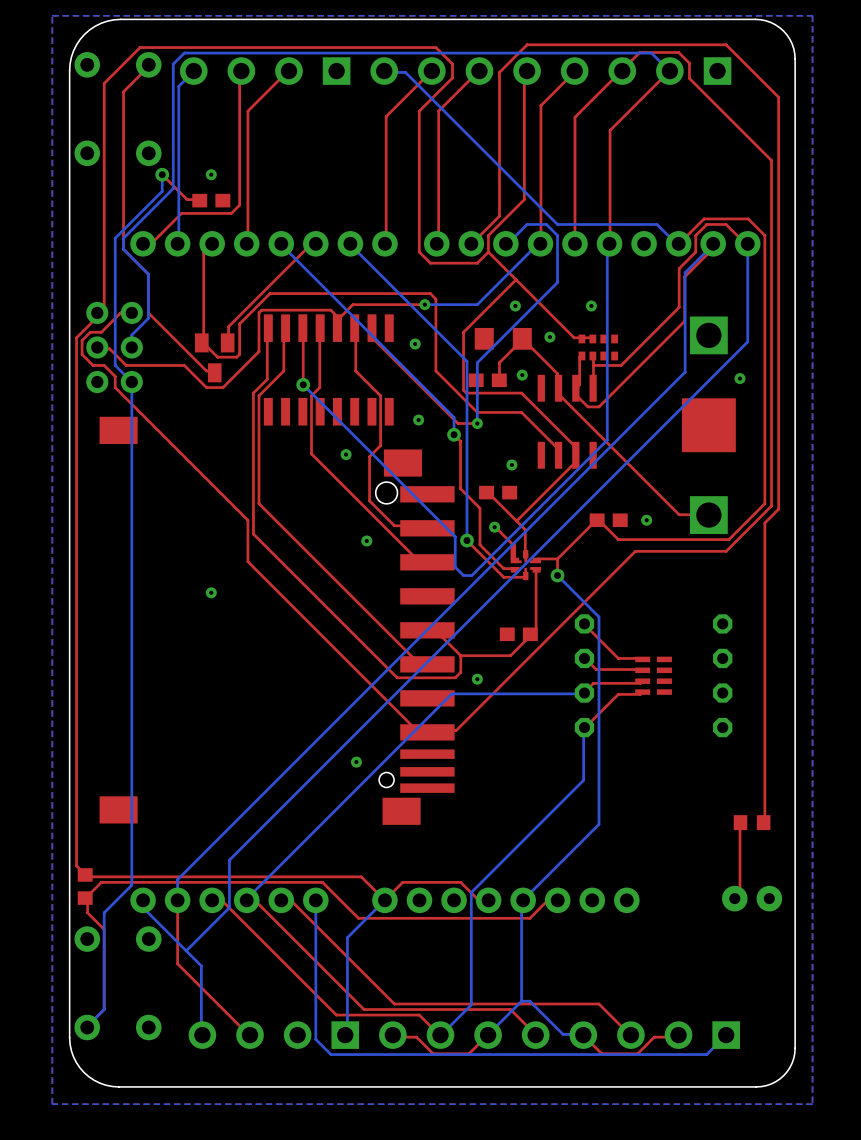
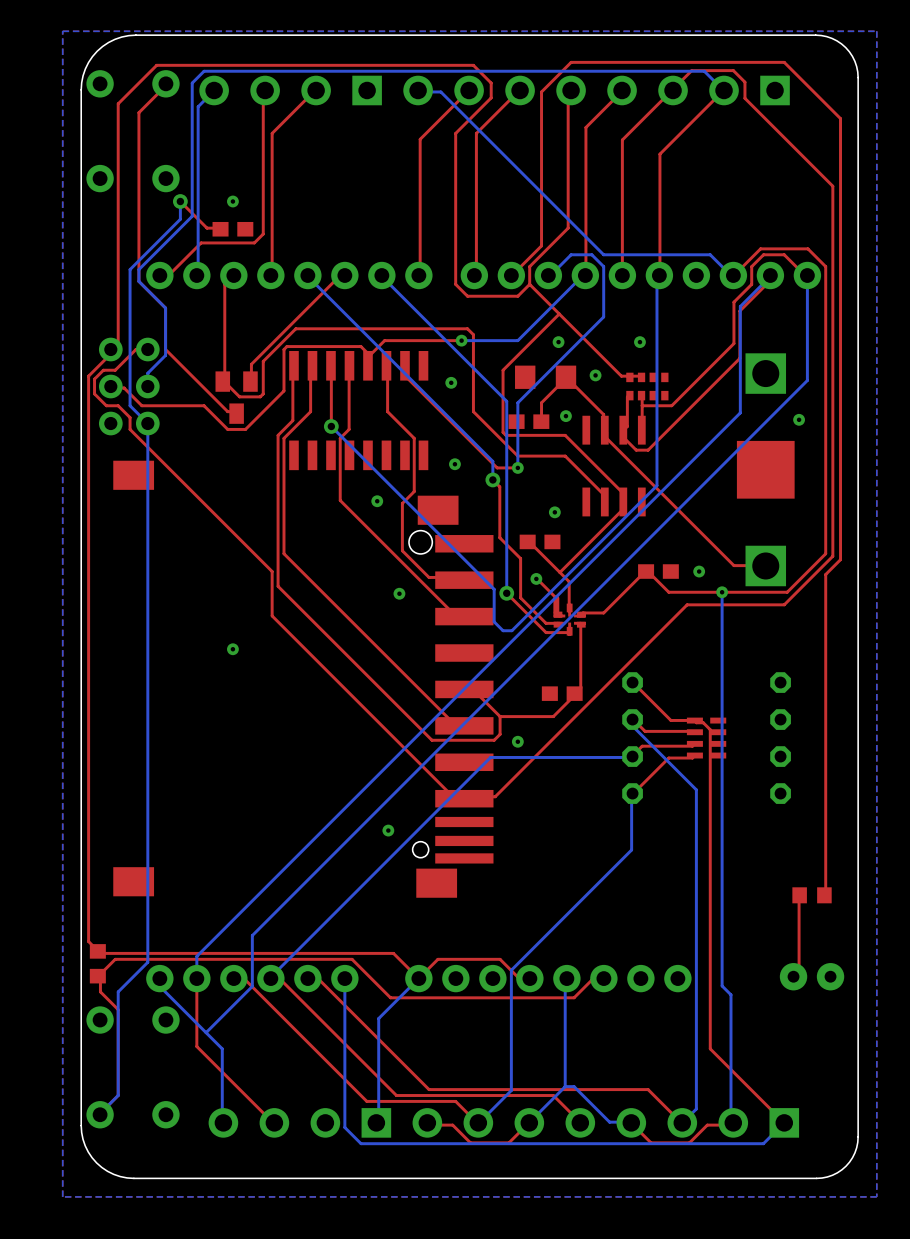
bottom track: none -> (722, 592) (722, 985) (730, 994) (730, 1122) (733, 1122)
via: none -> (722, 592)
top track: (557, 558) (557, 575) -> none
bottom track: (557, 575) (599, 617) (599, 824) (523, 900) -> none
via: (557, 575) -> none
top track: (584, 623) (618, 658) (642, 659) -> (632, 682) (670, 720) (695, 720) (696, 722) (703, 722) (710, 729) (710, 1048) (784, 1122)
bottom track: none -> (632, 719) (633, 727) (696, 789) (696, 1109) (682, 1122)

